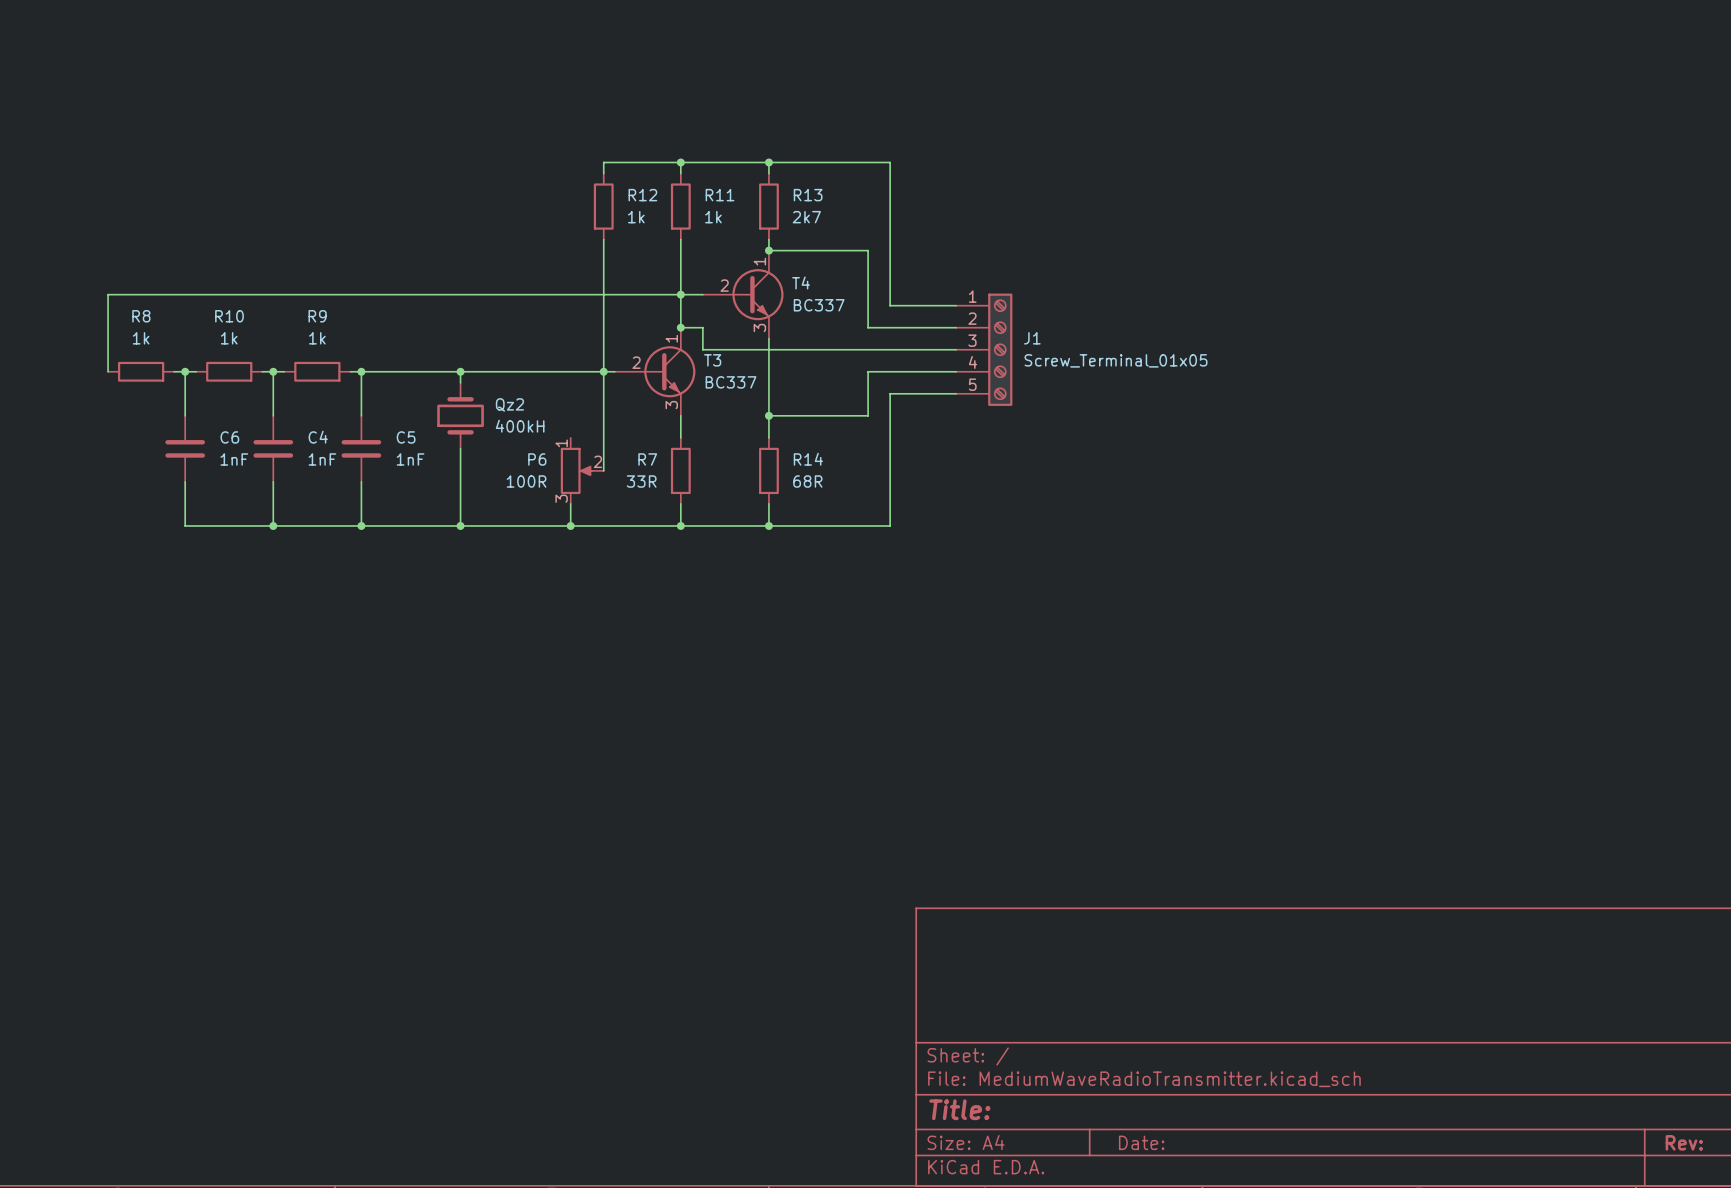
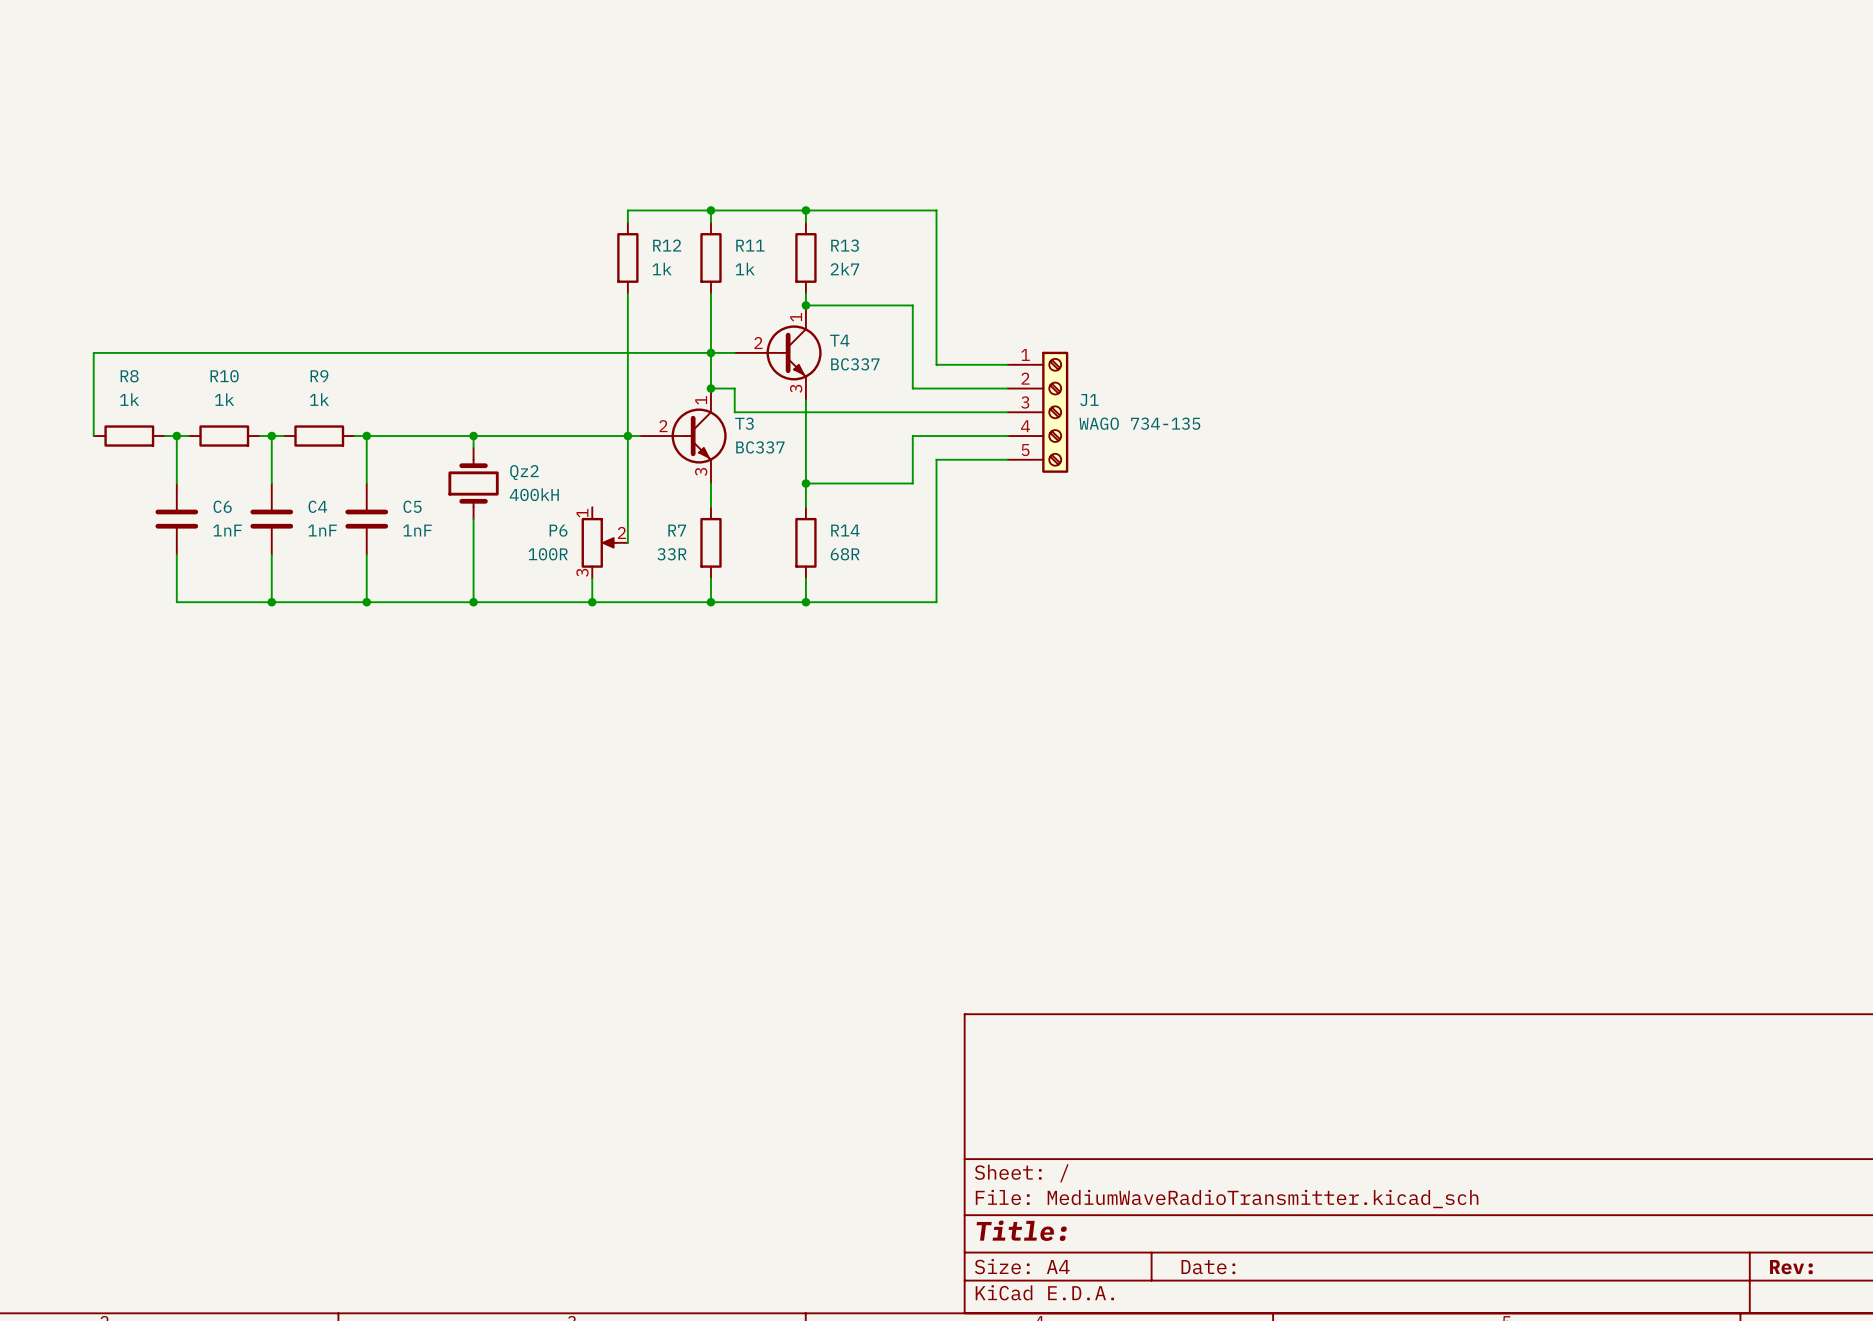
J1 value: Screw_Terminal_01x05 (1116, 360) -> WAGO 734-135 (1139, 423)

